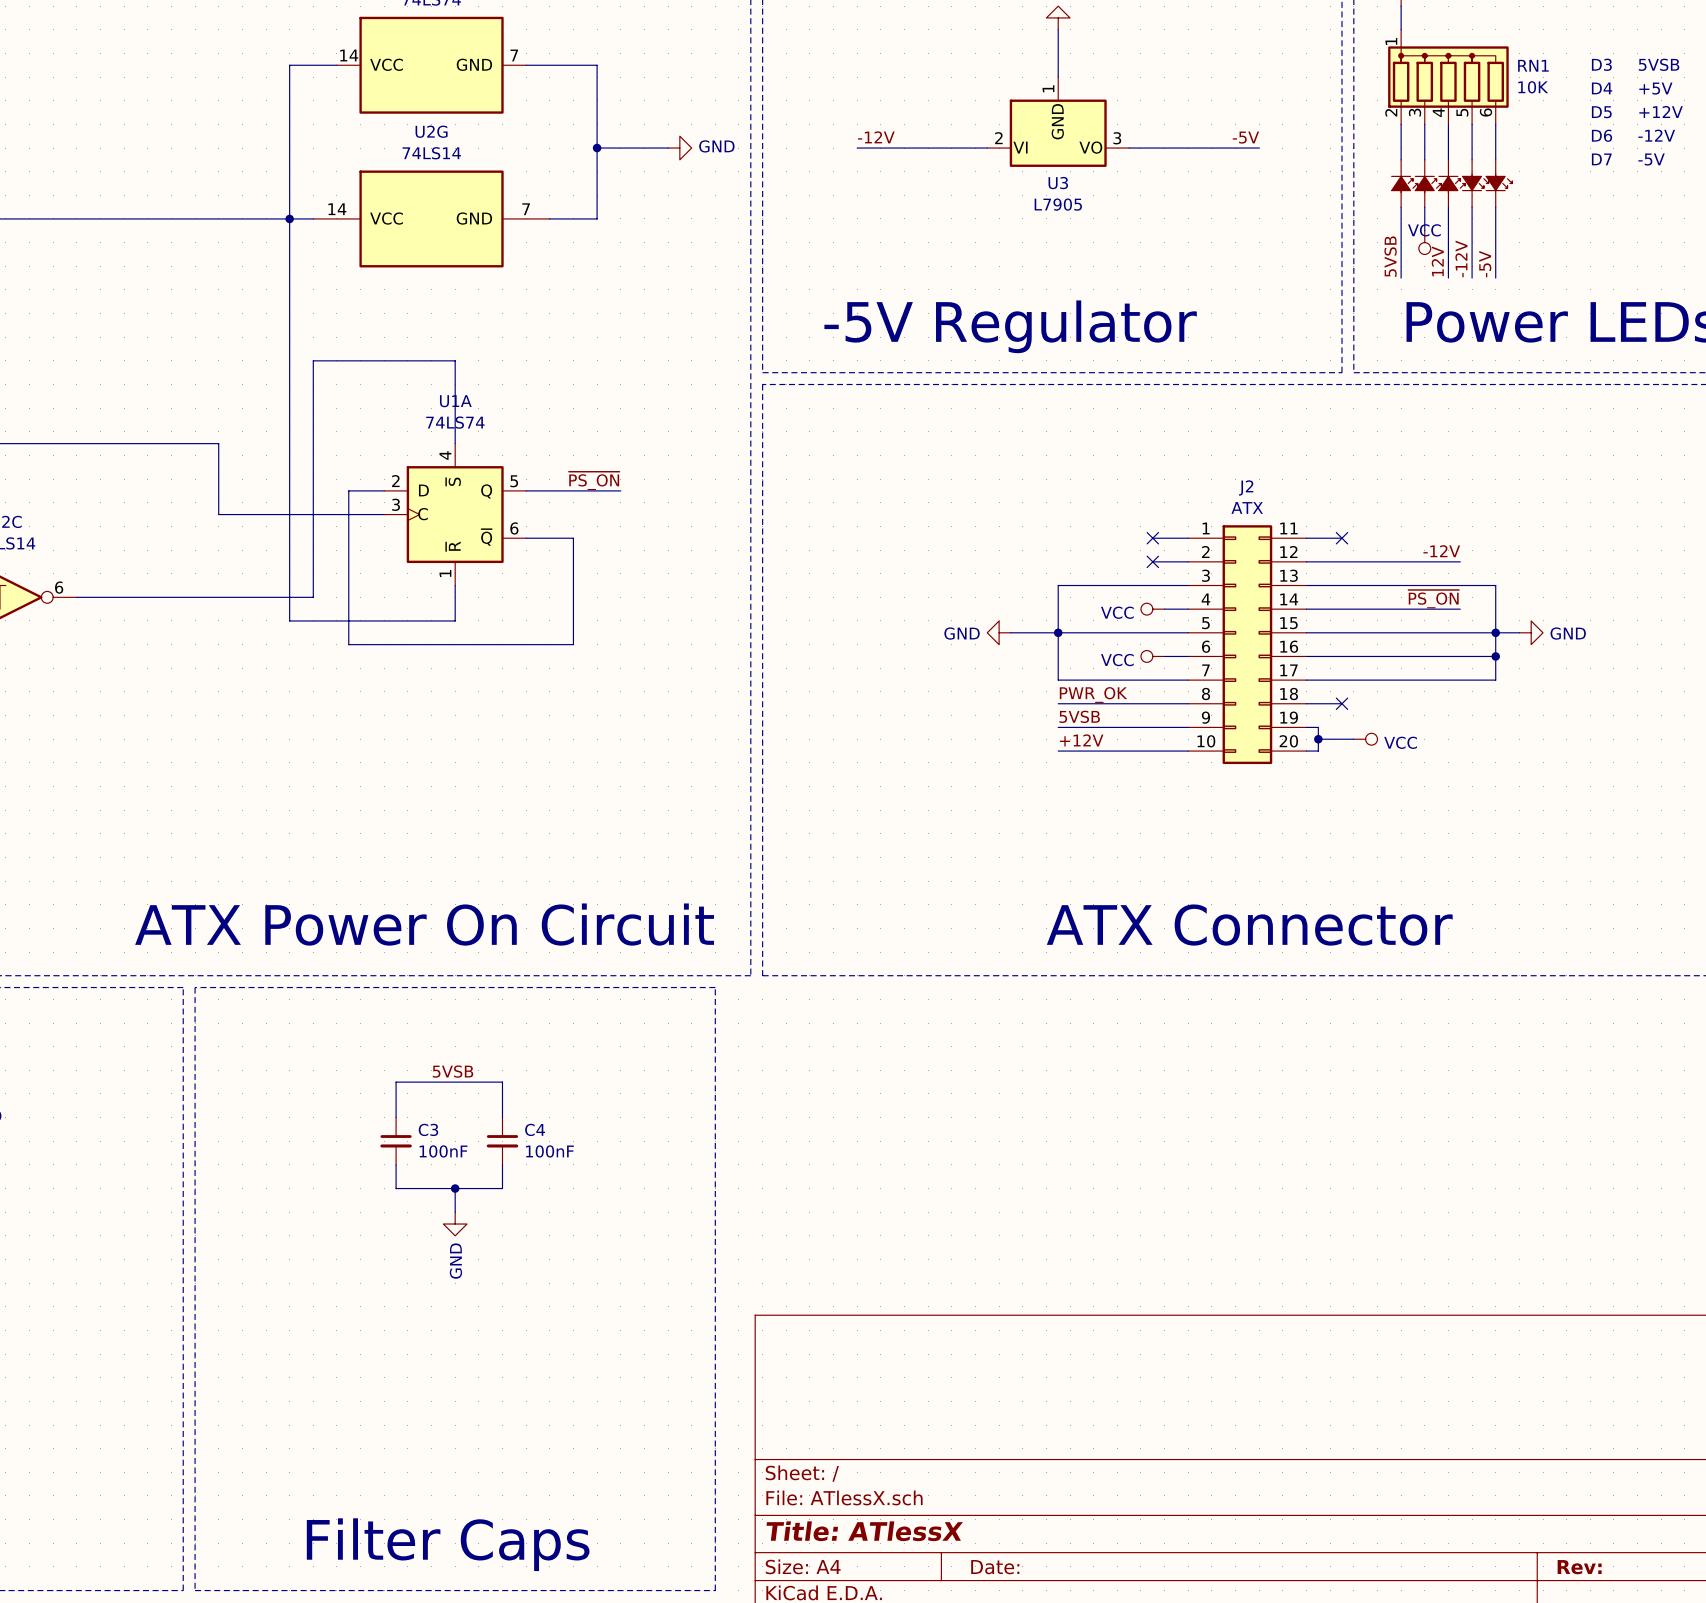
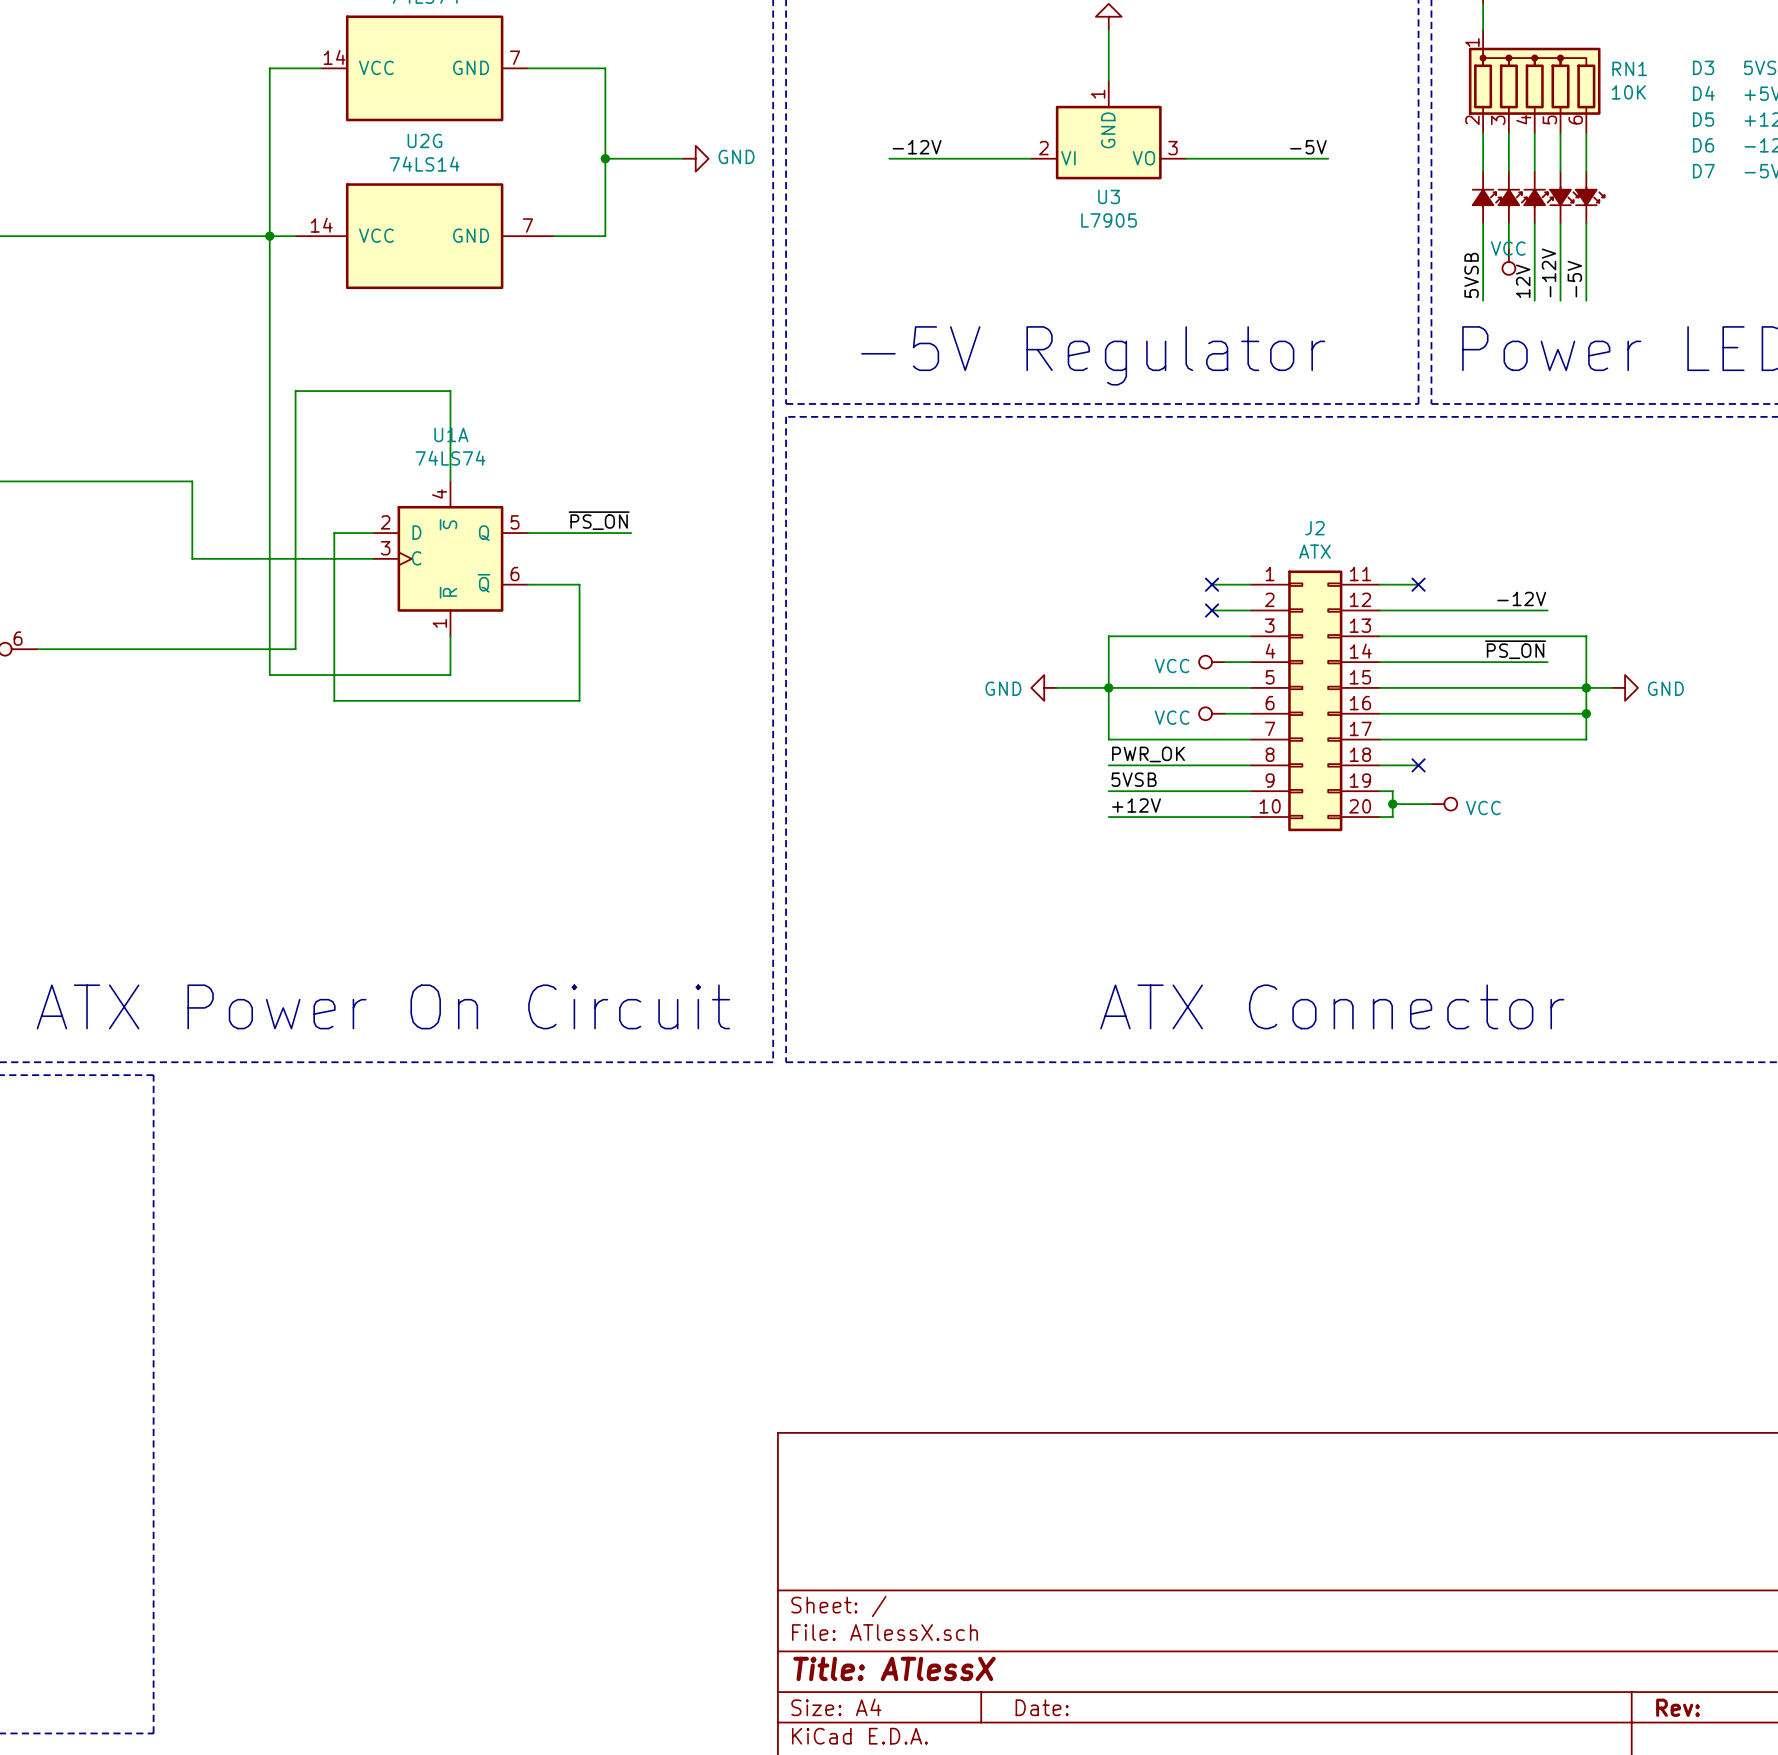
line: (195, 987) (195, 1590) (715, 1590) (715, 987) (195, 987) -> none
label: 5VSB (453, 1071) -> none
wire: (396, 1117) (396, 1082) (502, 1082) (502, 1117) -> none
C3: 100nF (396, 1141) -> none
C4: 100nF (502, 1141) -> none
wire: (396, 1164) (396, 1188) (502, 1188) (502, 1164) -> none
wire: (455, 1188) (455, 1212) -> none
junction: (455, 1188) -> none
power symbol: GND (455, 1224) -> none
text: Filter Caps (448, 1544) -> none

